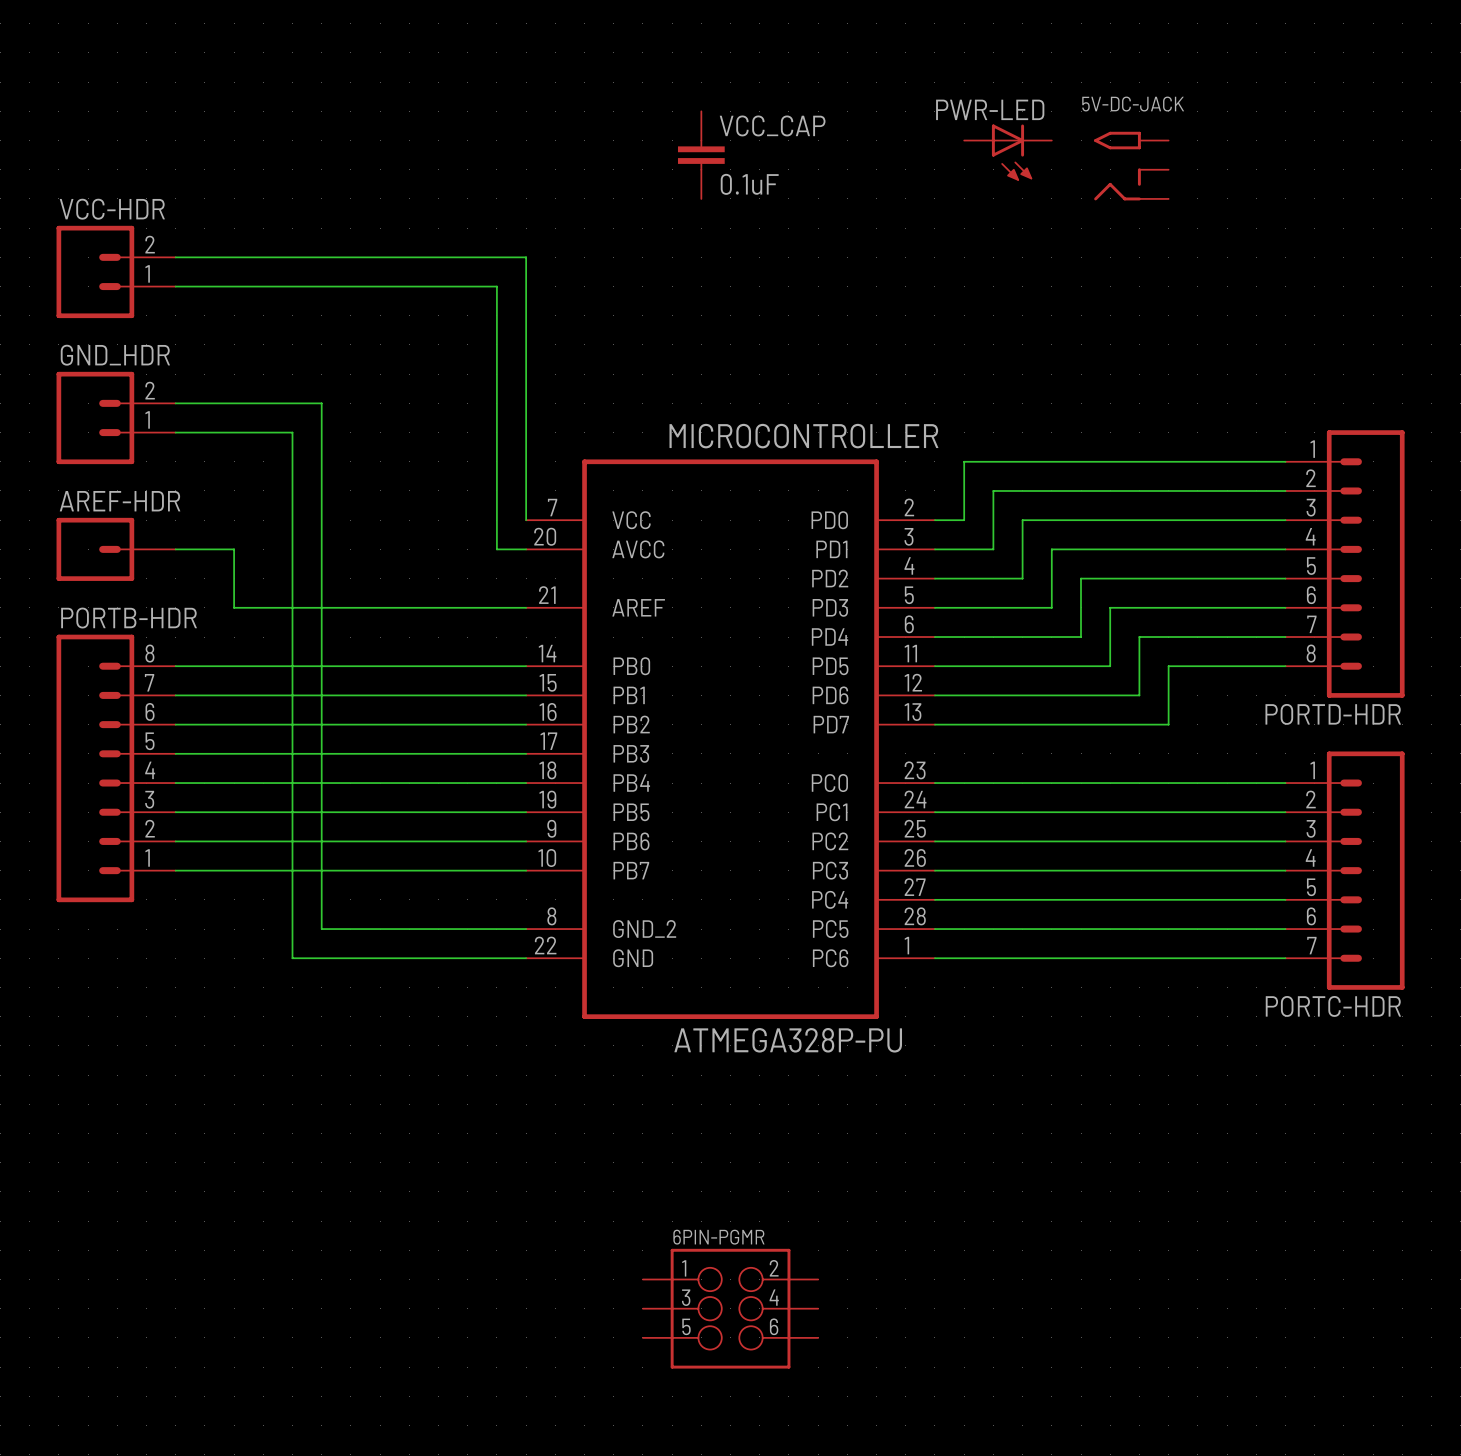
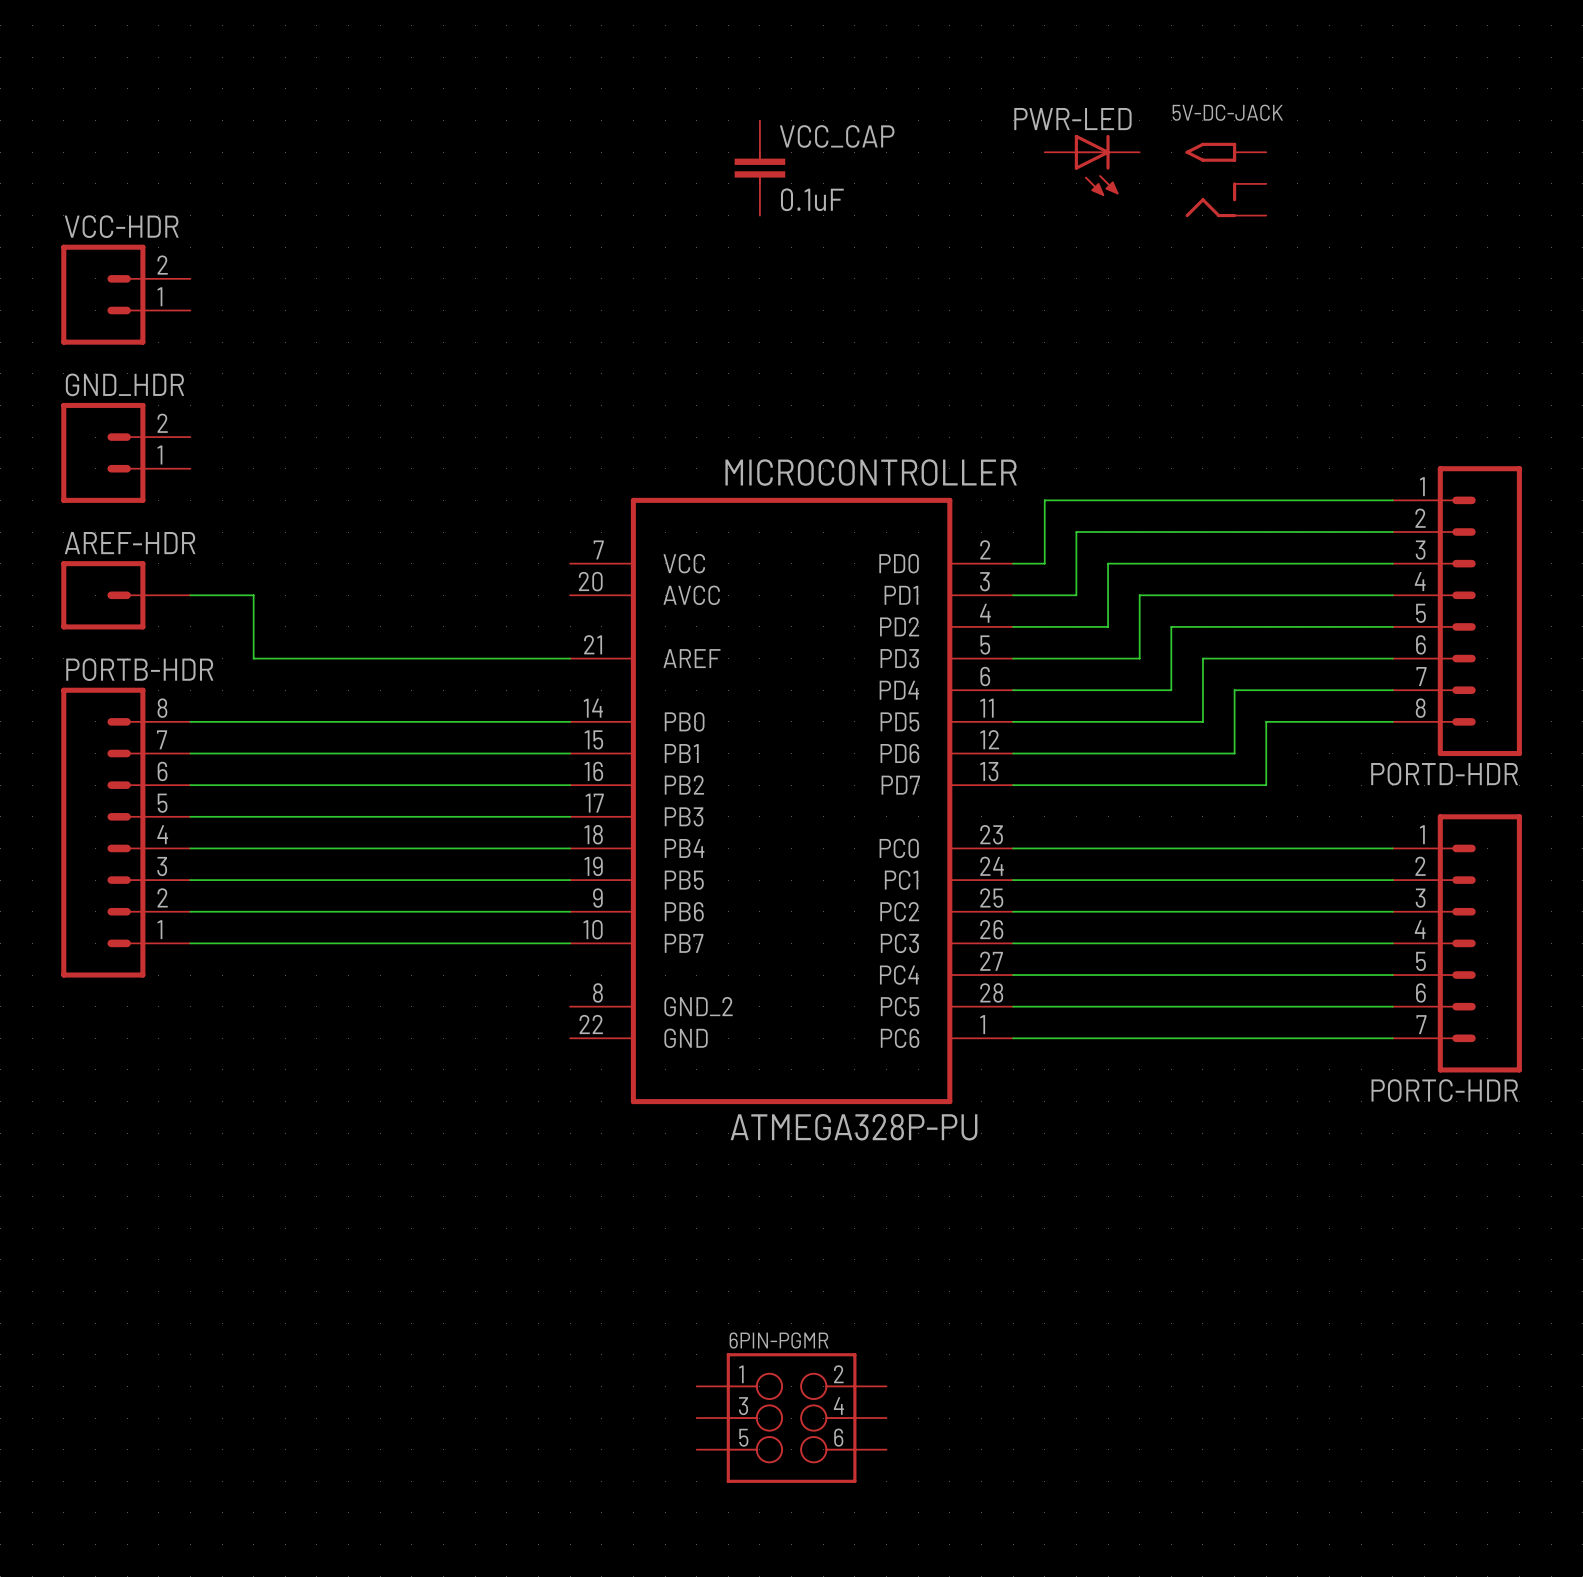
wire: (175, 257) (526, 257) (526, 520) -> none
wire: (175, 286) (496, 286) (496, 549) (526, 549) -> none
wire: (175, 403) (321, 403) (321, 929) (526, 929) -> none
wire: (175, 432) (292, 432) (292, 958) (526, 958) -> none

